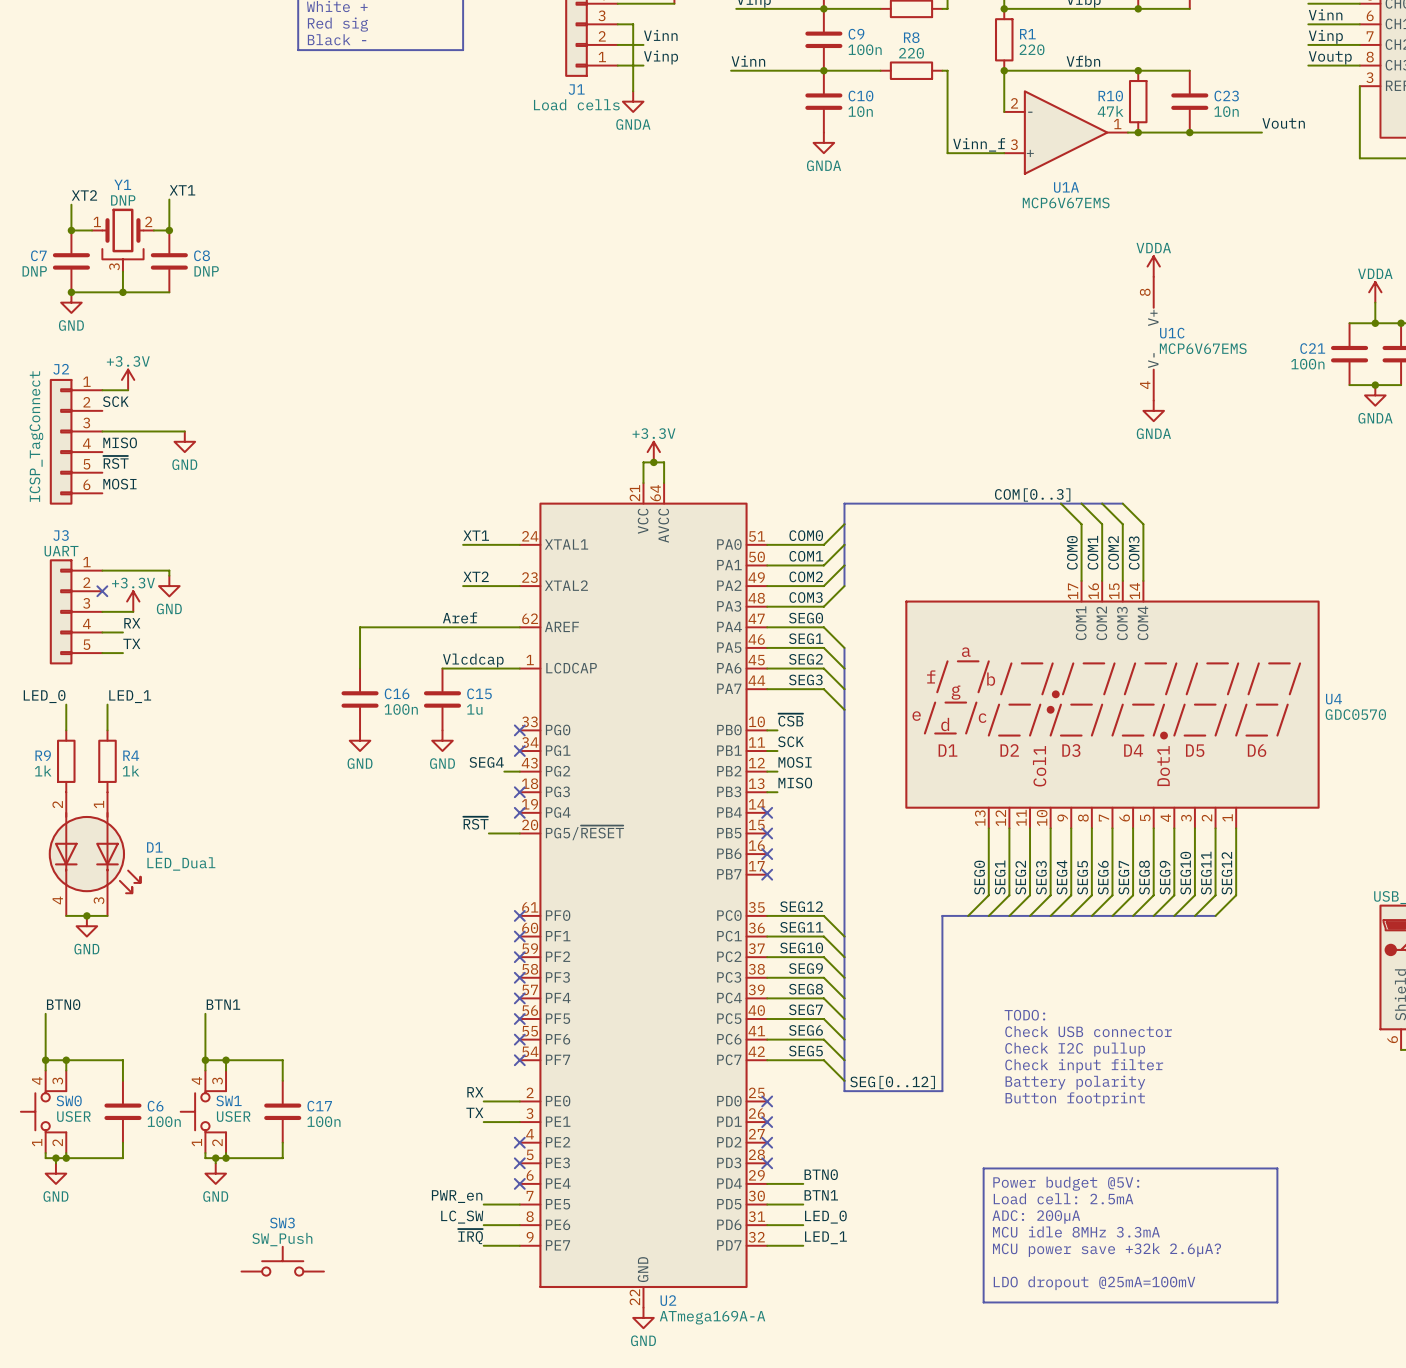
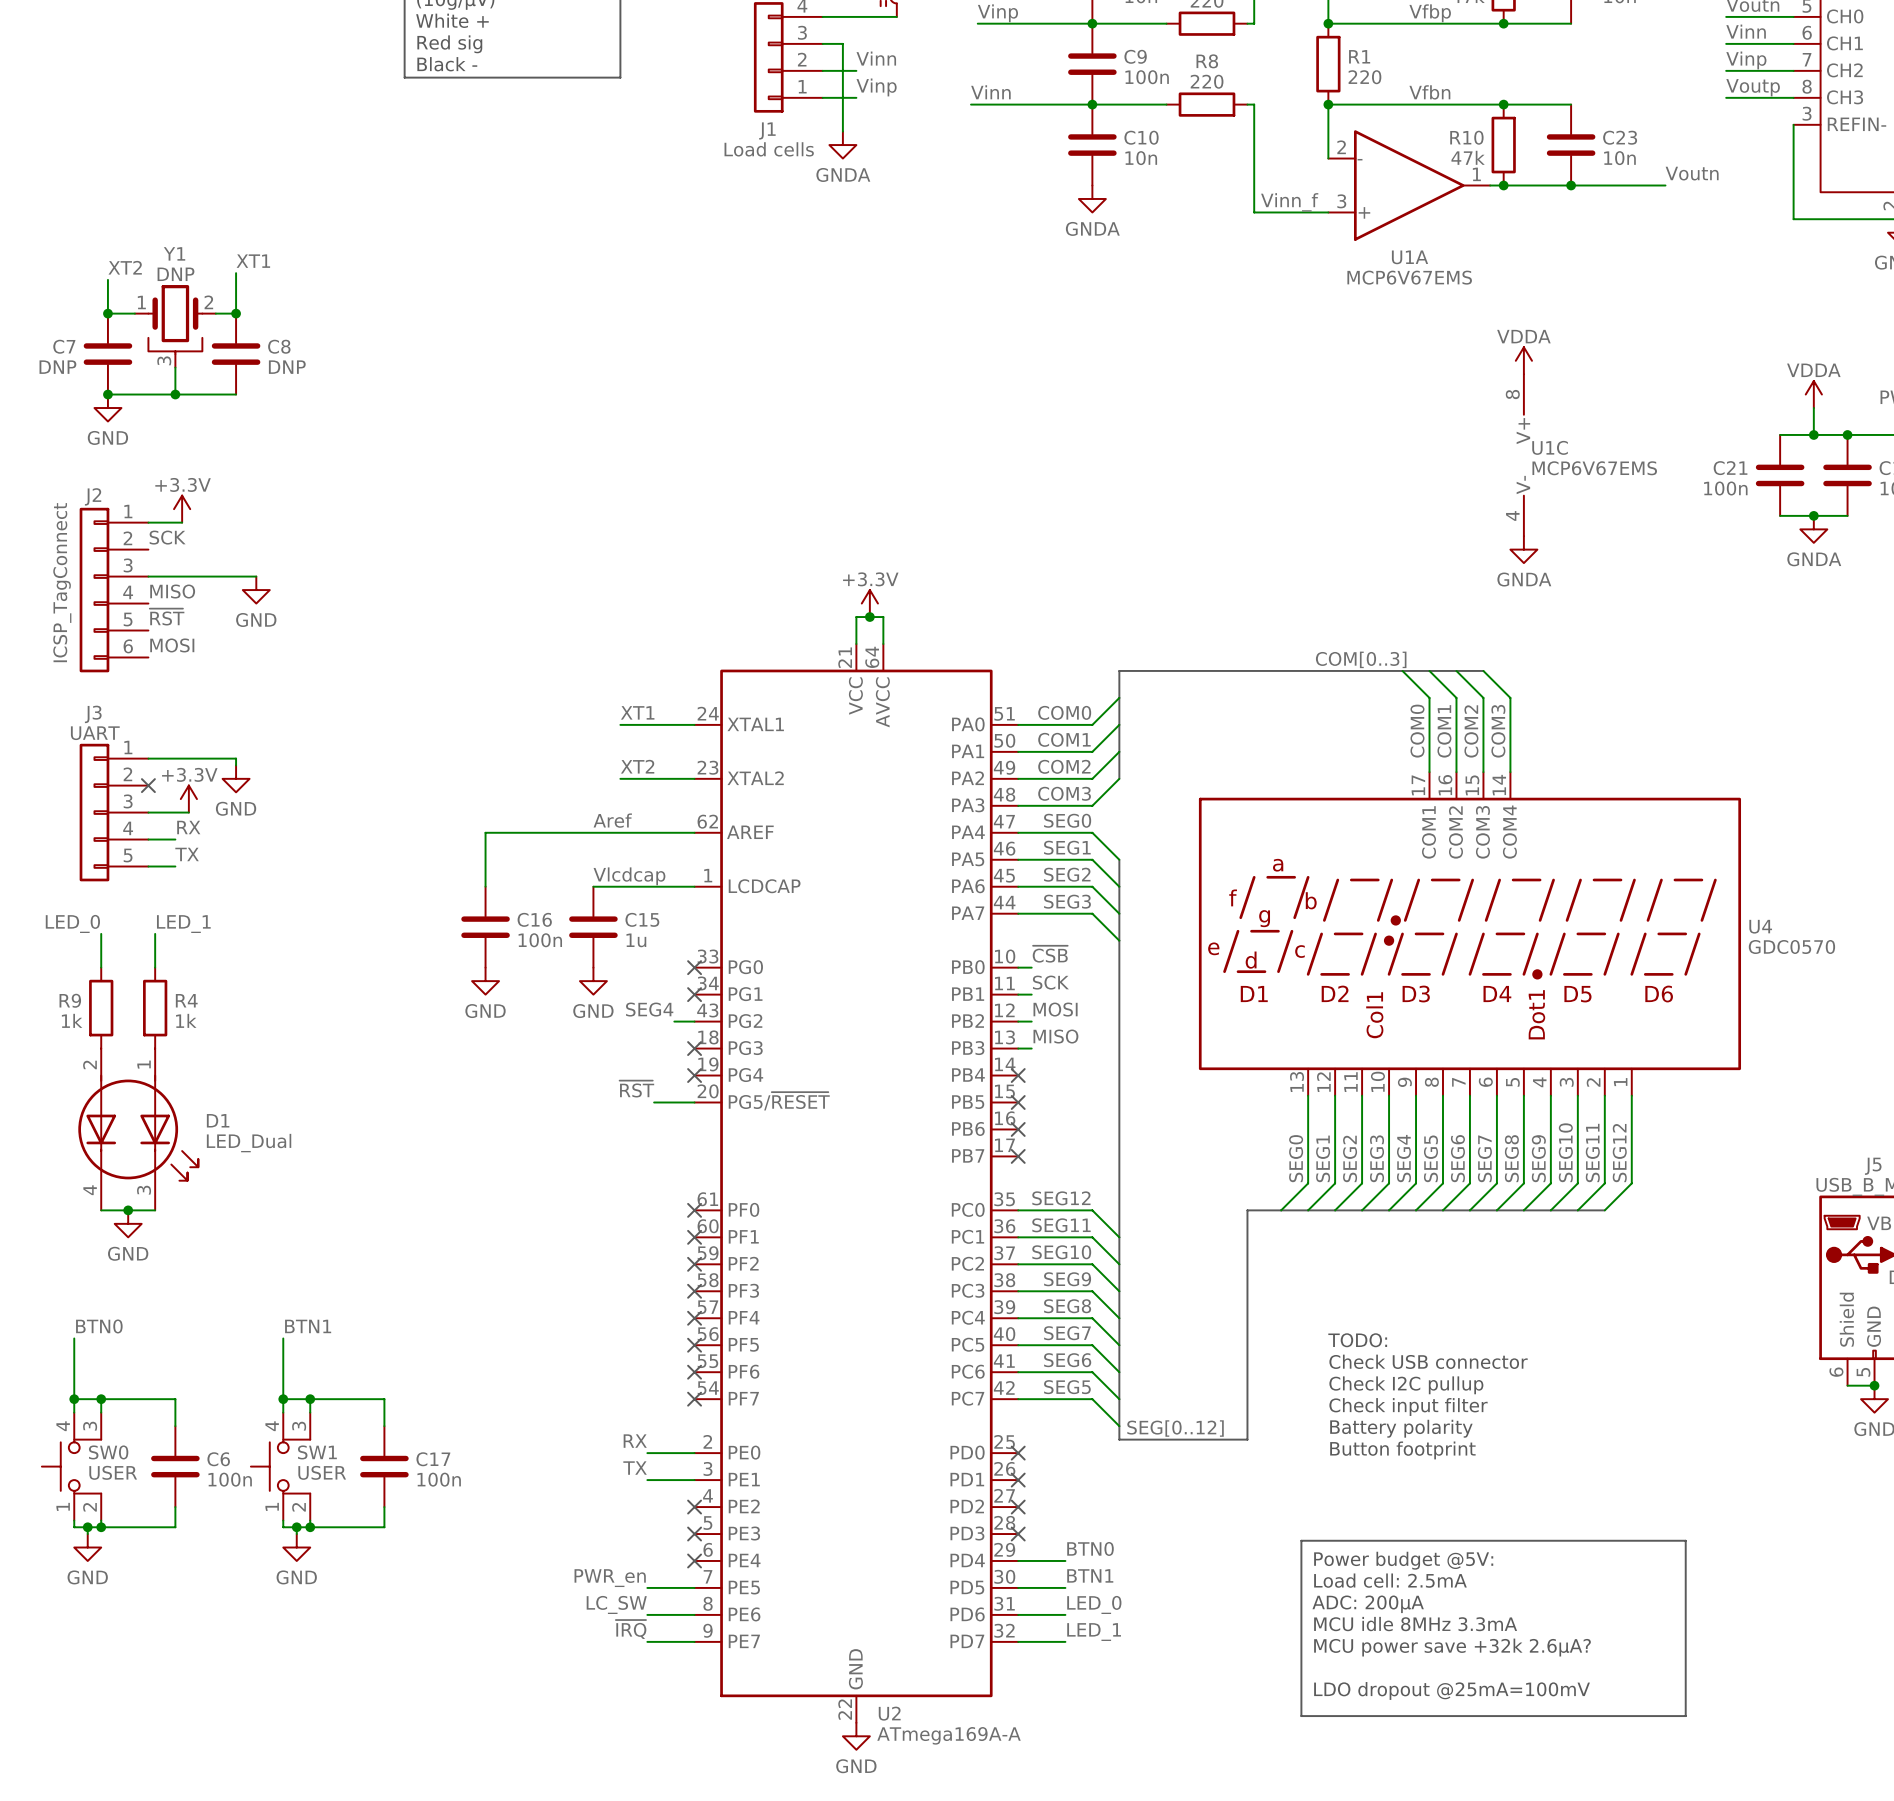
SW3: SW_Push (282, 1261) -> none

